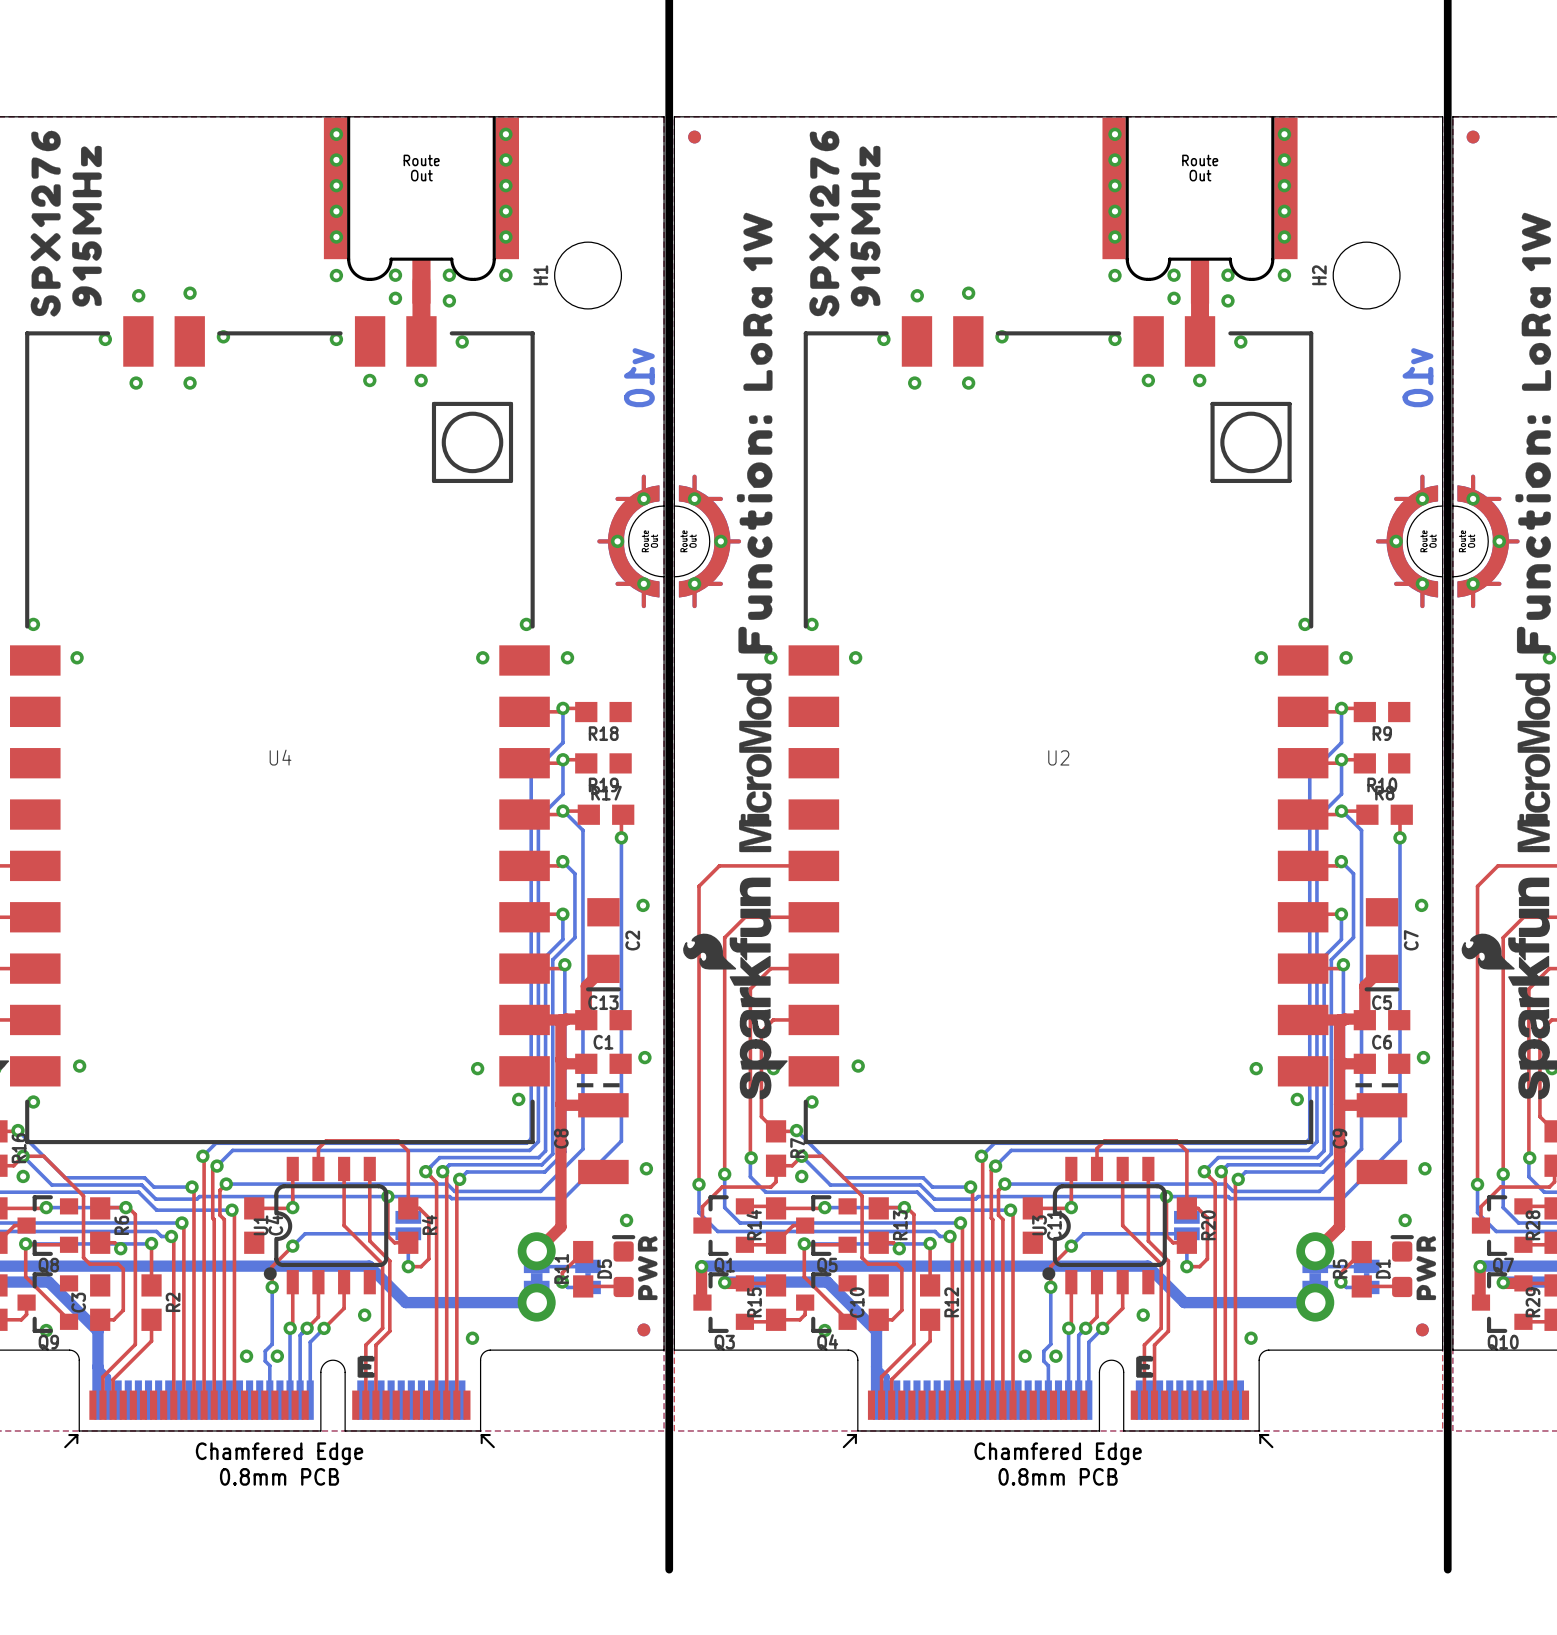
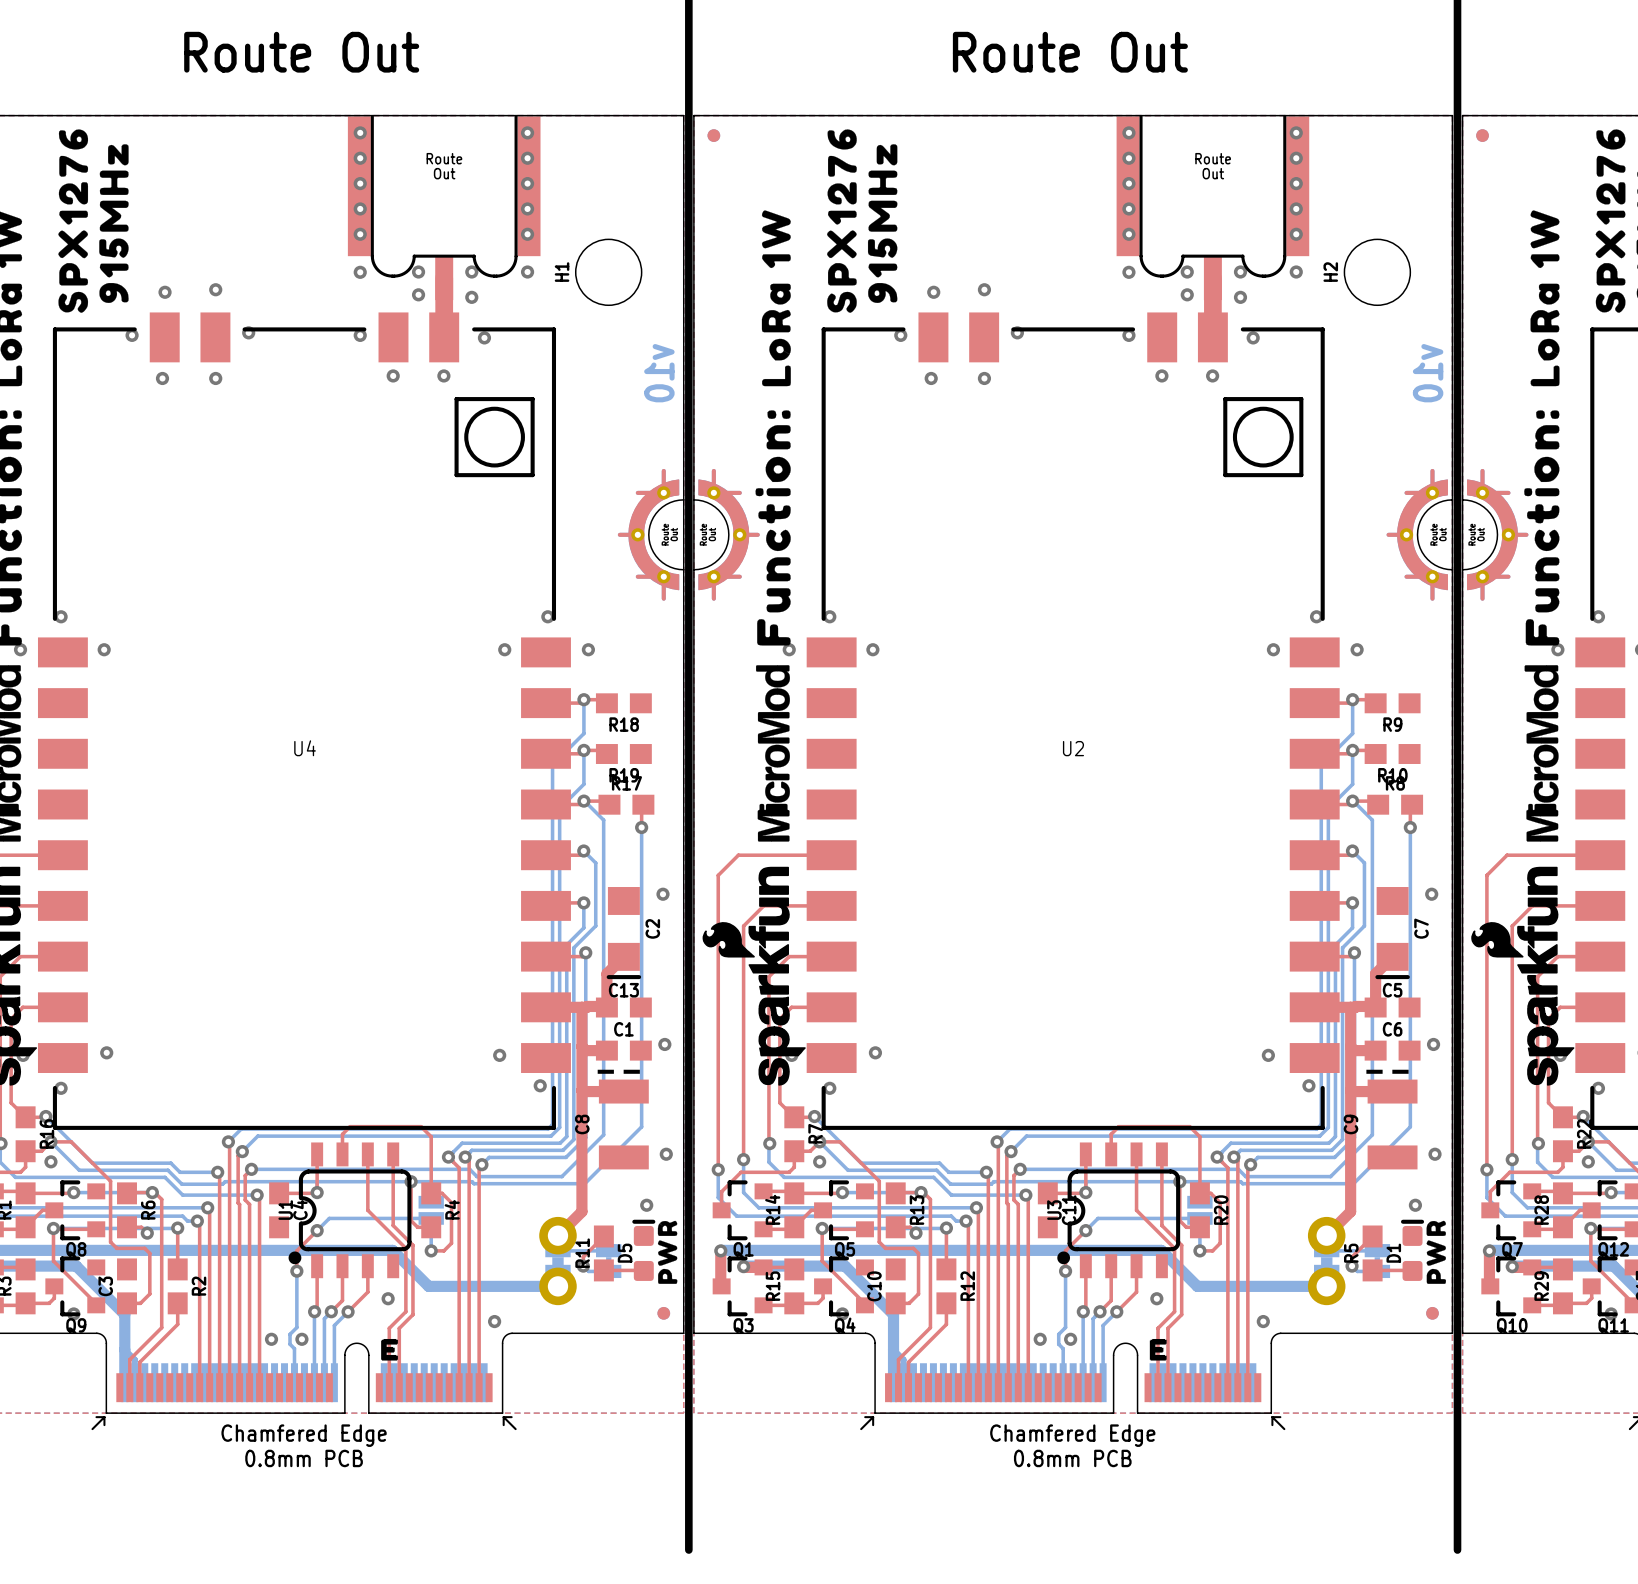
text: none -> Route Out (301, 52)
text: none -> Route Out (1070, 52)

